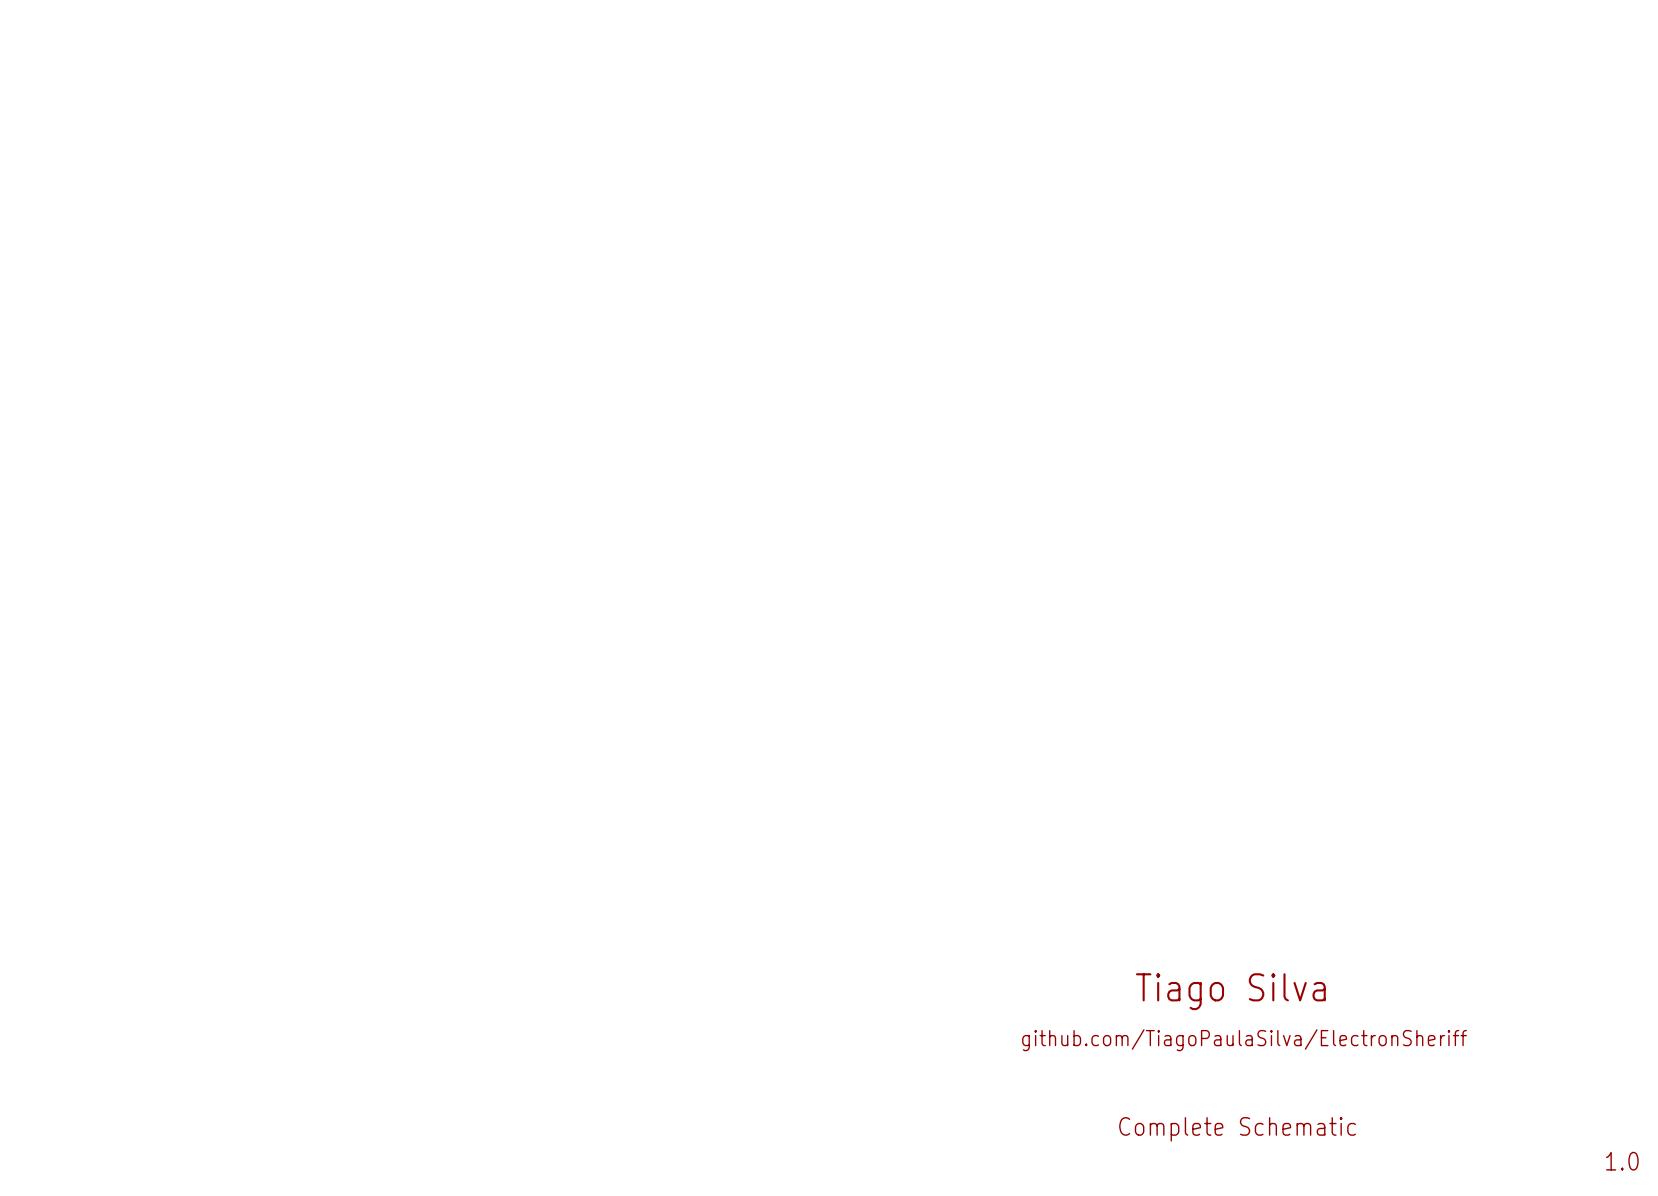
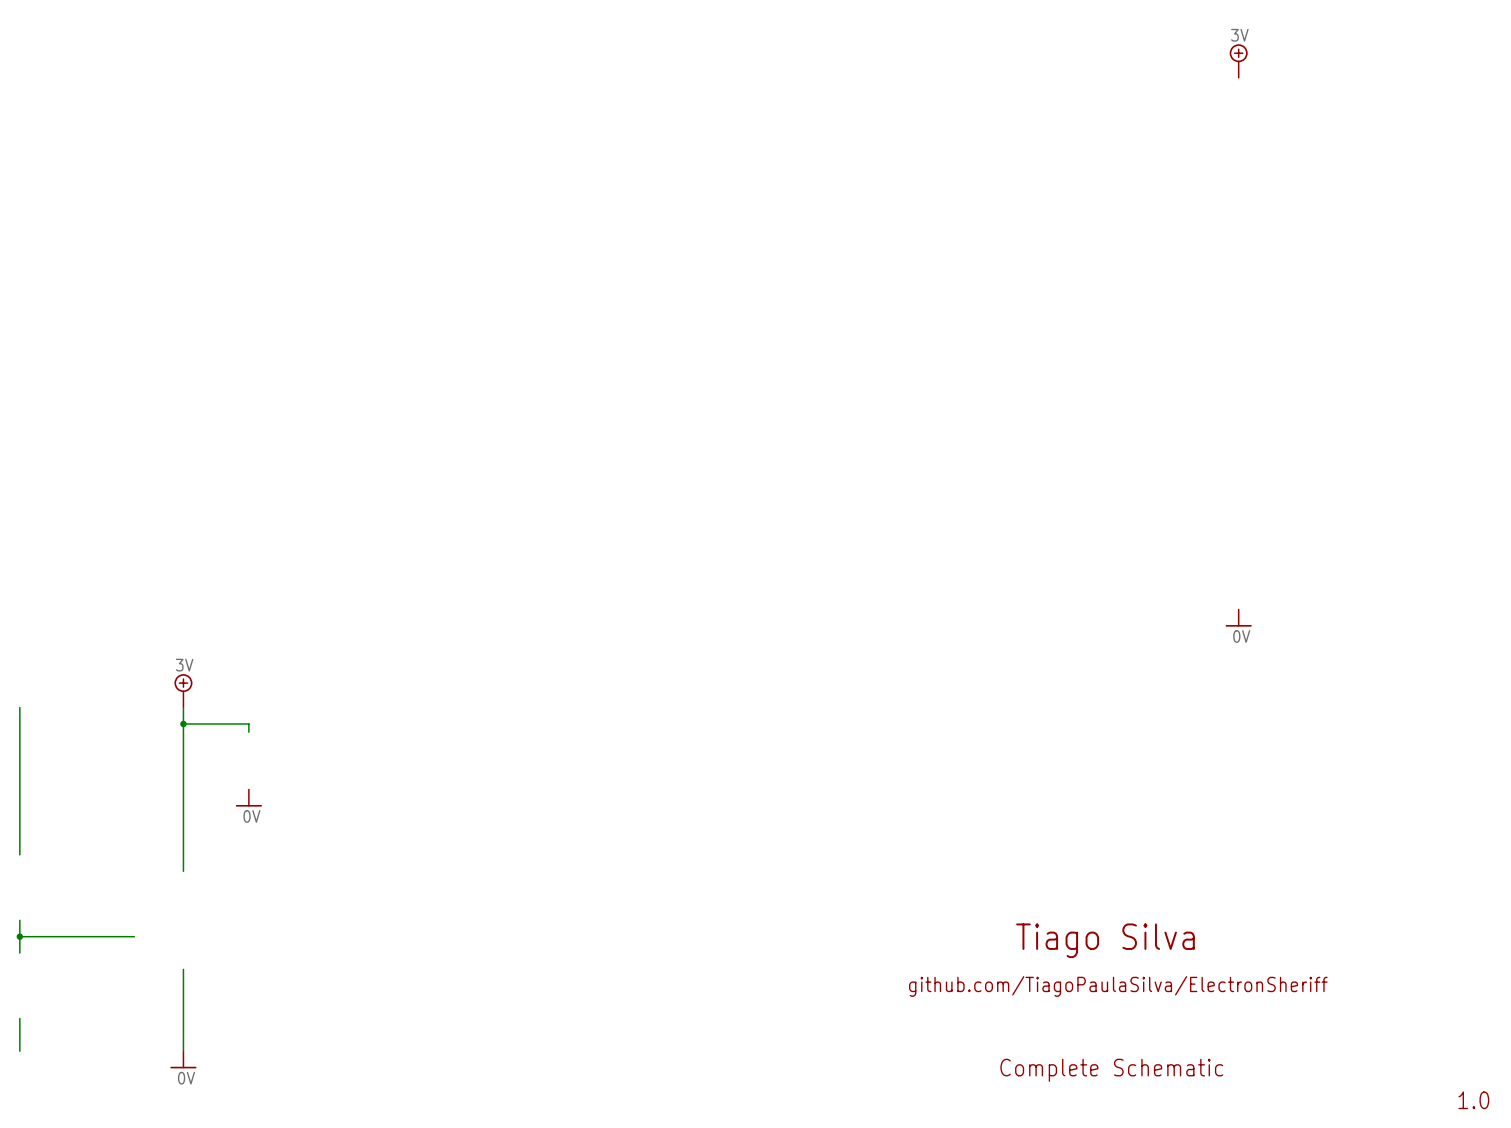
power symbol: none -> 3V (1238, 61)
power symbol: none -> 0V (1238, 618)
power symbol: none -> 3V (183, 690)
wire: none -> (19, 707) (19, 854)
wire: none -> (183, 707) (183, 871)
wire: none -> (183, 724) (248, 724) (248, 732)
junction: none -> (183, 724)
power symbol: none -> 0V (248, 798)
wire: none -> (19, 920) (19, 953)
wire: none -> (19, 936) (134, 936)
junction: none -> (19, 936)
wire: none -> (183, 969) (183, 1051)
wire: none -> (19, 1018) (19, 1051)
power symbol: none -> 0V (183, 1059)

